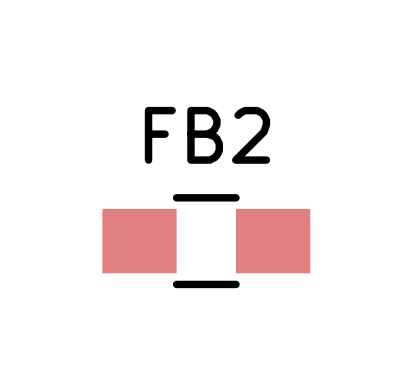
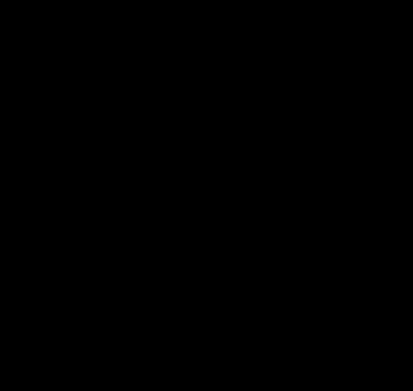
FB2: (206, 241) -> none

